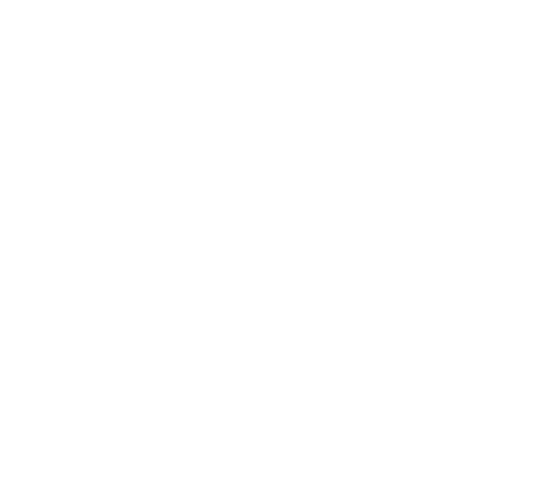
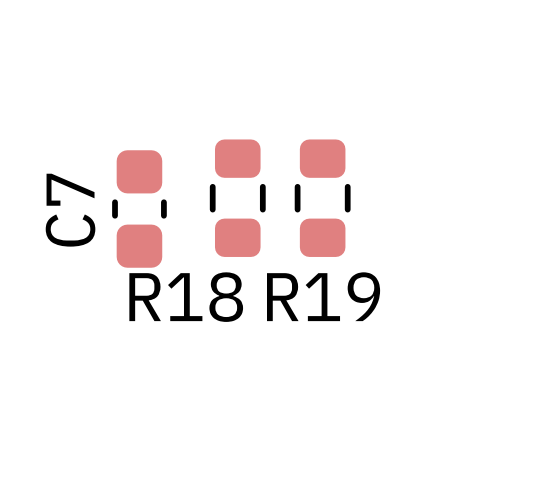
R18: none -> (237, 198)
R19: none -> (322, 198)
C7: none -> (139, 209)

